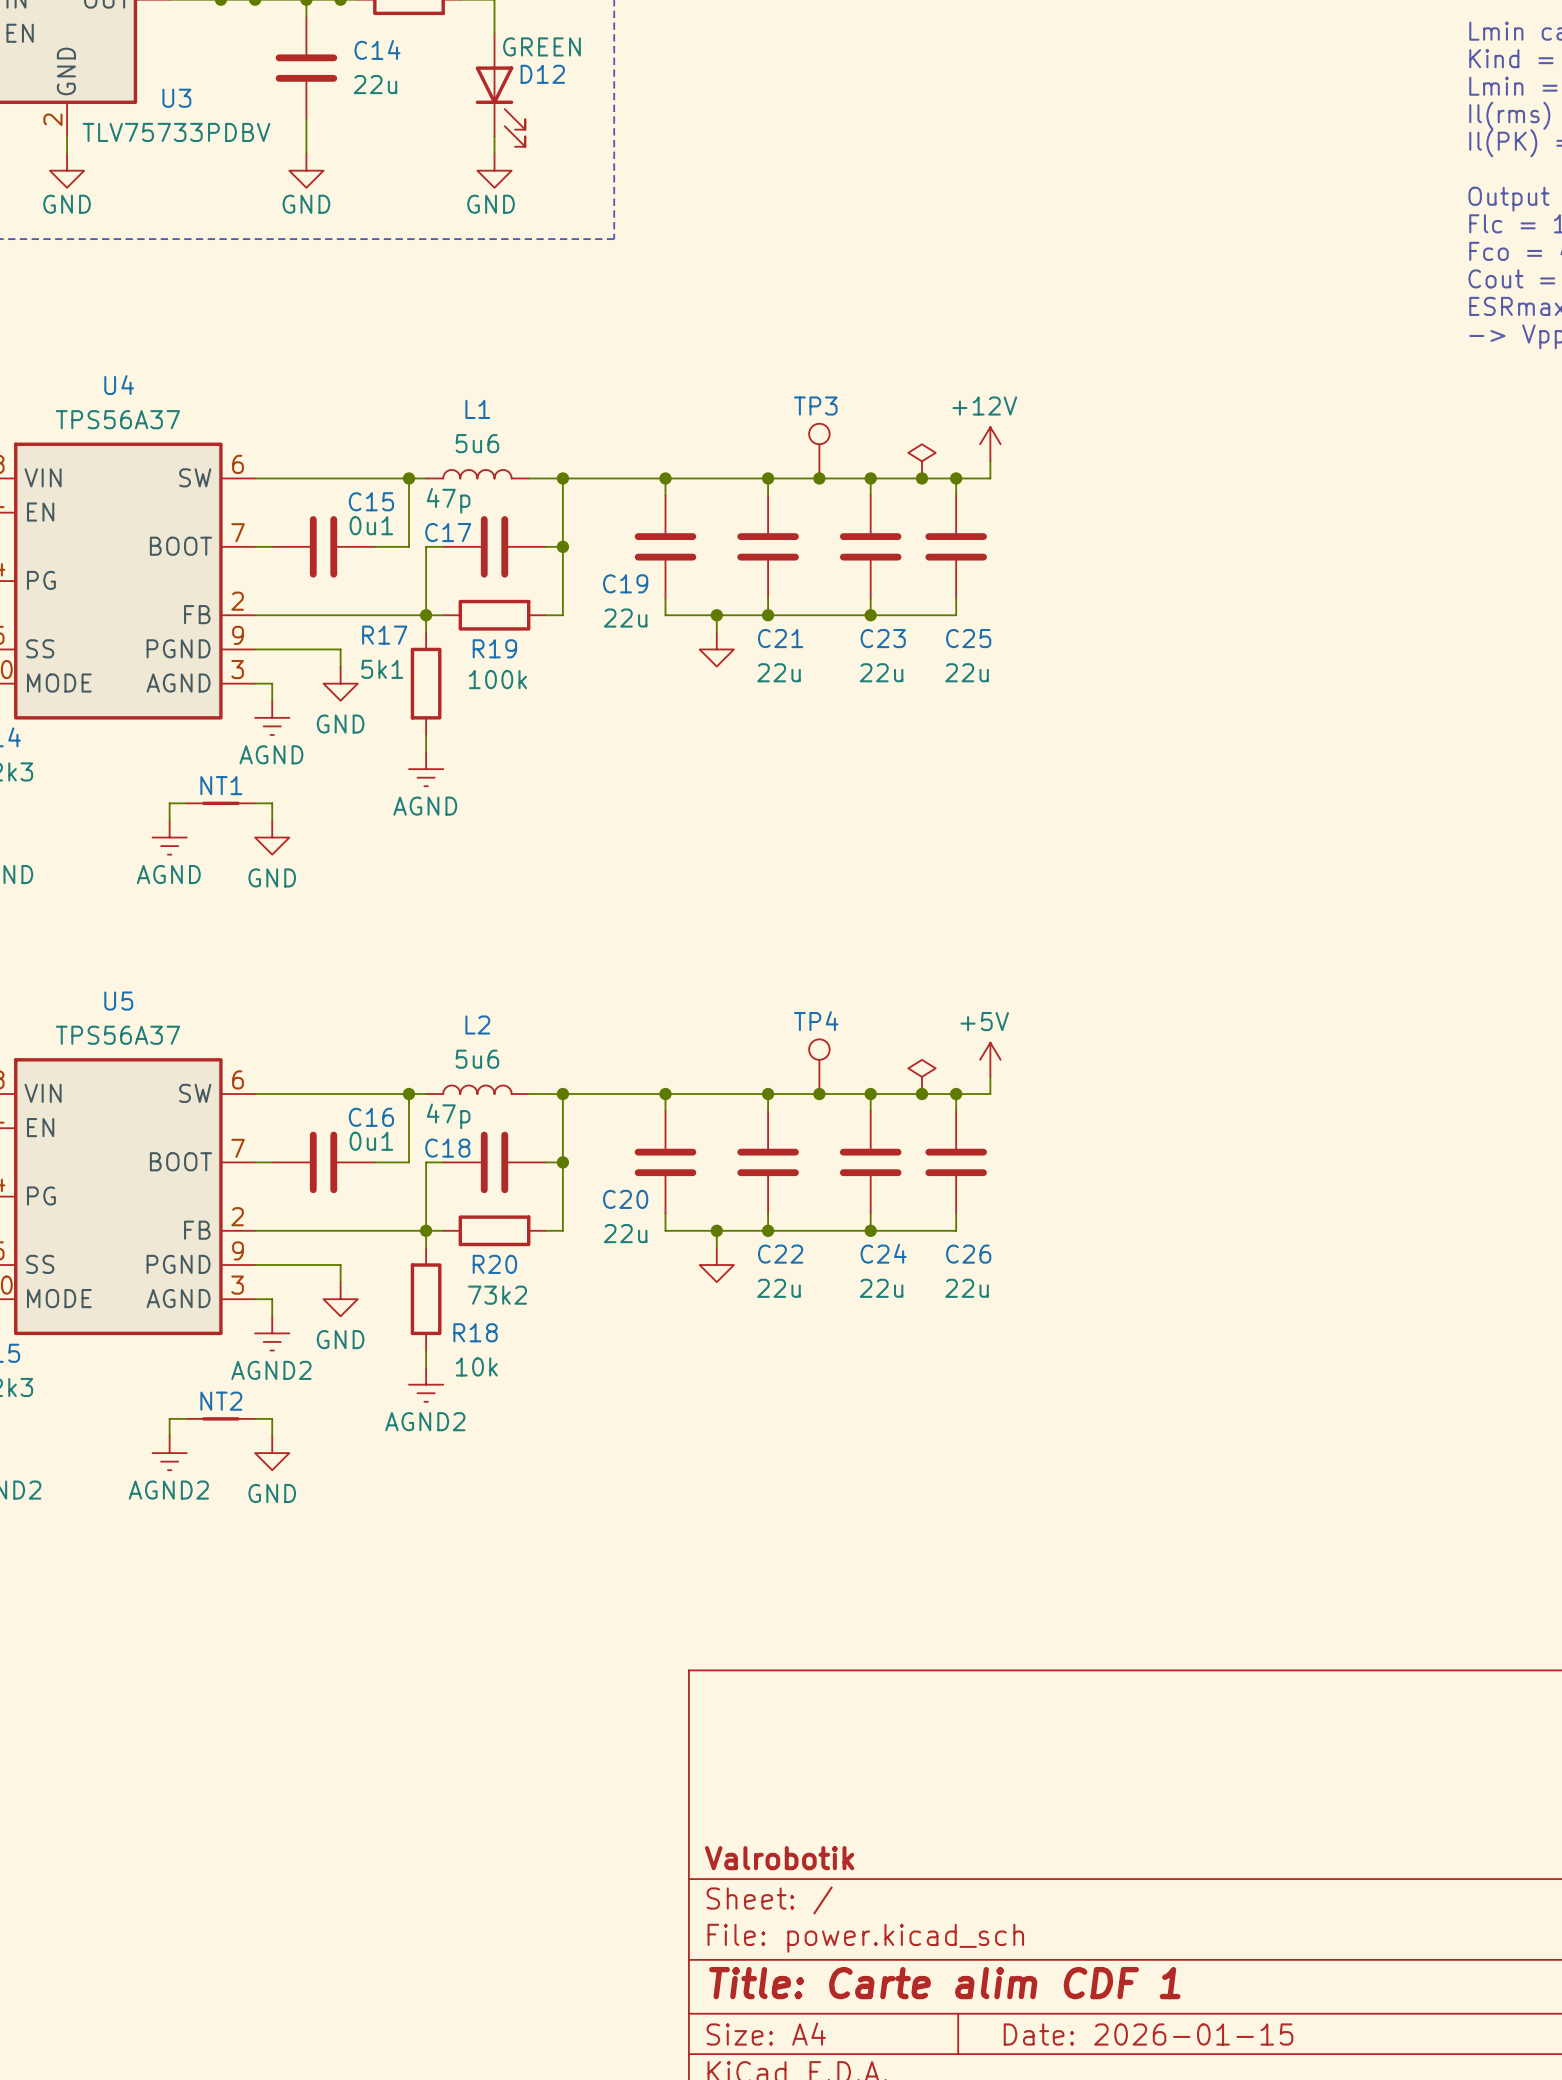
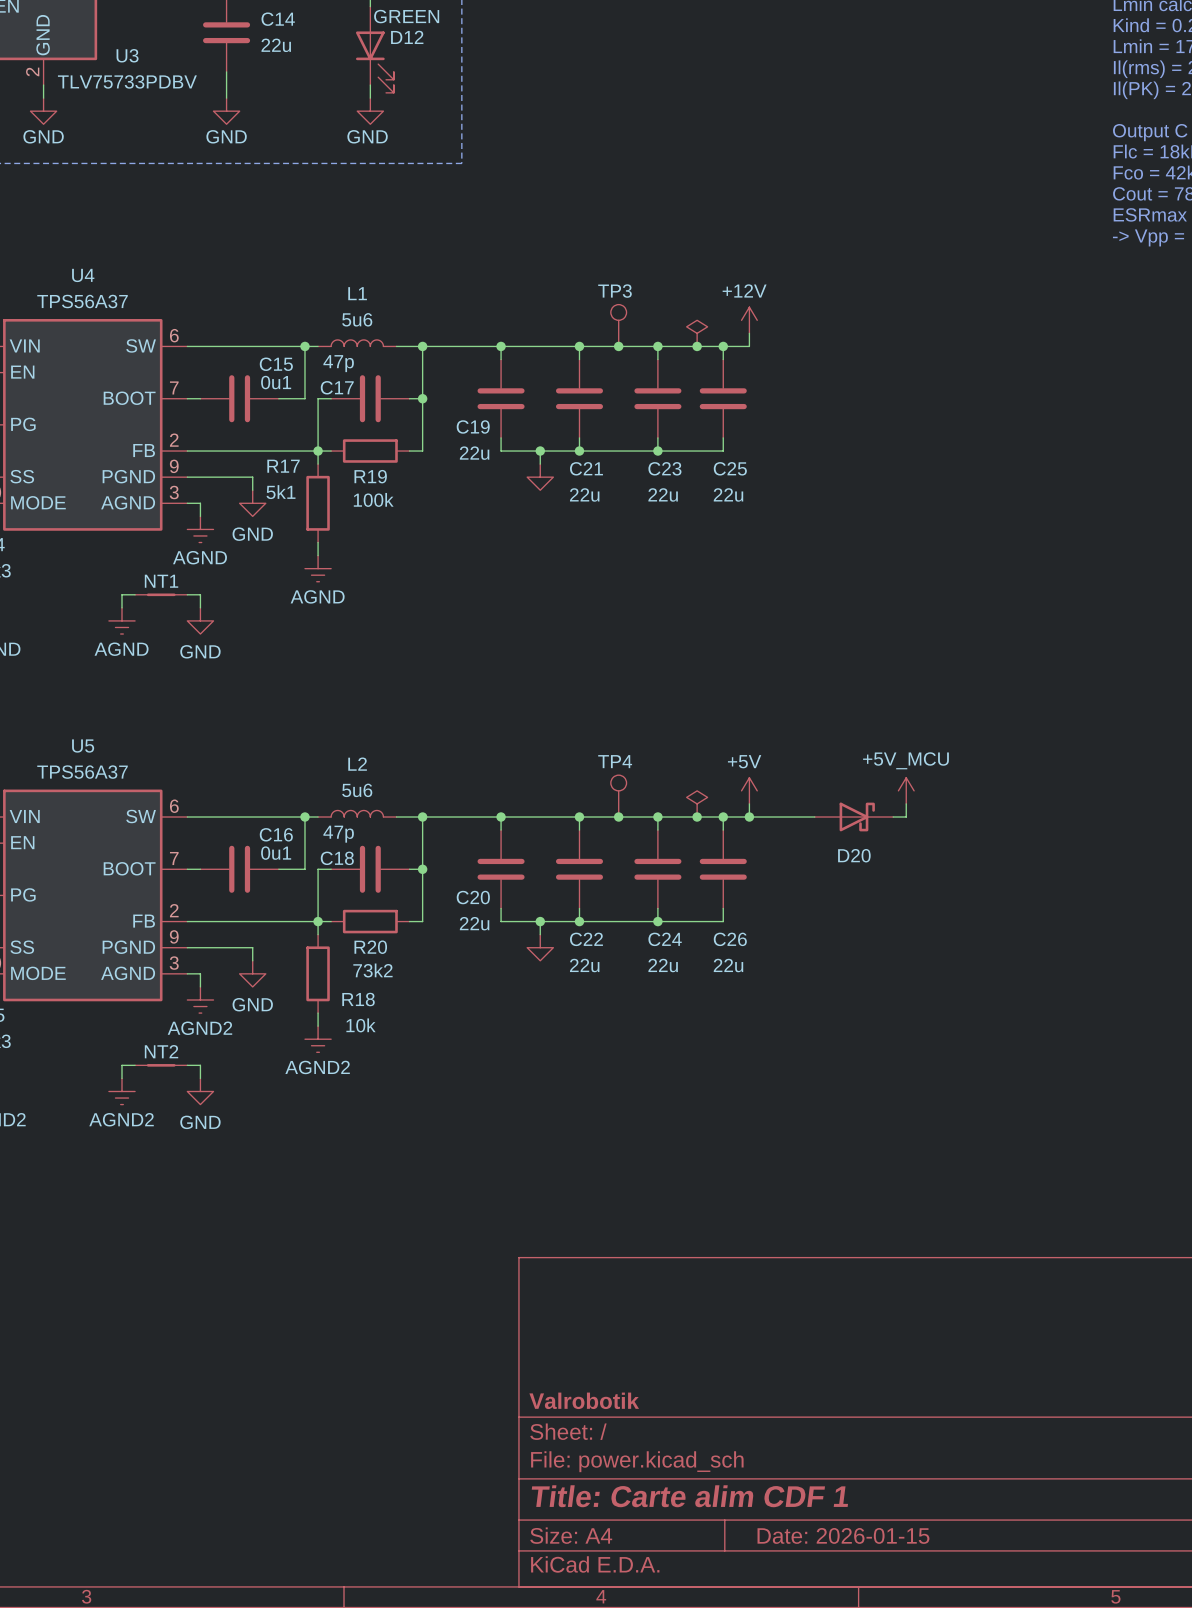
power symbol: none -> +5V_MCU (906, 790)
wire: none -> (906, 803) (906, 817) (893, 817)
wire: none -> (749, 817) (814, 817)
junction: none -> (749, 817)
D20: none -> (853, 817)

